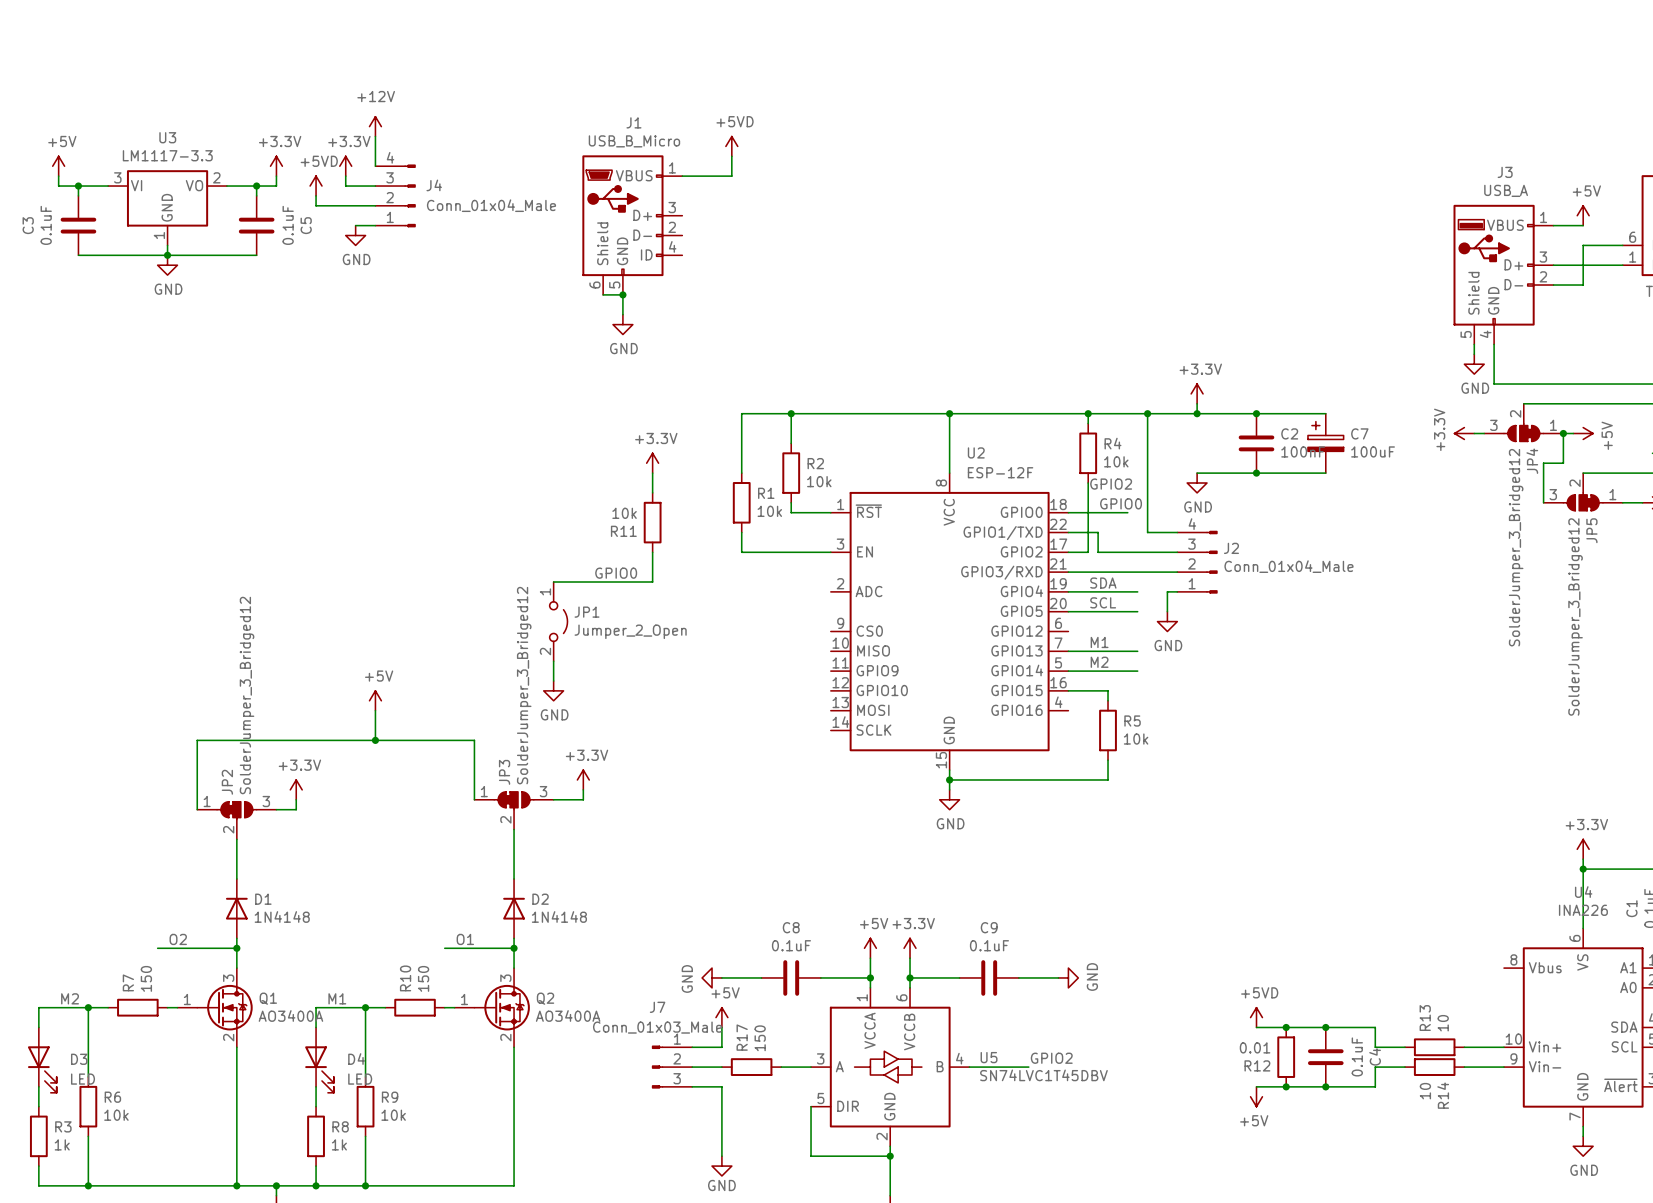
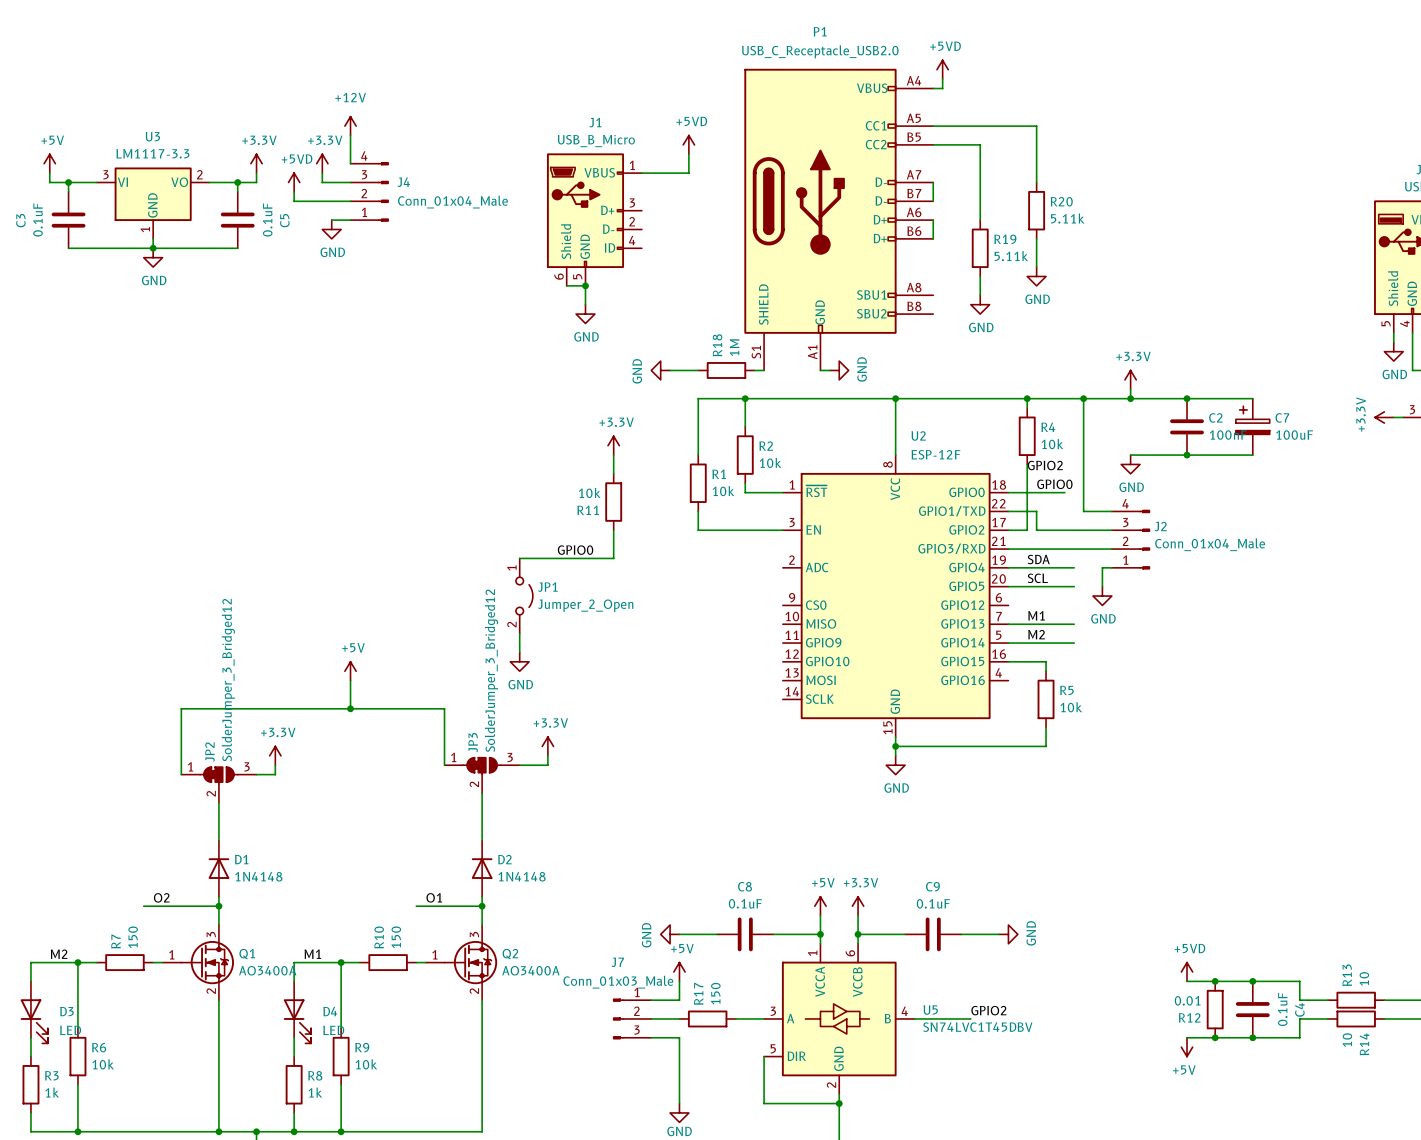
power symbol: none -> +5VD (942, 69)
wire: none -> (942, 79) (942, 88) (933, 88)
wire: none -> (933, 126) (1036, 126) (1036, 182)
wire: none -> (933, 144) (980, 144) (980, 220)
wire: none -> (933, 182) (933, 201)
R20: none -> 5.11k (1036, 210)
P1: none -> USB_C_Receptacle_USB2.0 (838, 219)
wire: none -> (933, 220) (933, 238)
wire: none -> (1036, 238) (1036, 267)
R19: none -> 5.11k (980, 248)
wire: none -> (980, 276) (980, 295)
power symbol: none -> GND (1036, 276)
power symbol: none -> GND (980, 304)
power symbol: none -> GND (660, 370)
wire: none -> (670, 370) (698, 370)
R18: none -> 1M (726, 370)
wire: none -> (754, 370) (764, 370)
wire: none -> (820, 370) (829, 370)
power symbol: none -> GND (839, 370)

